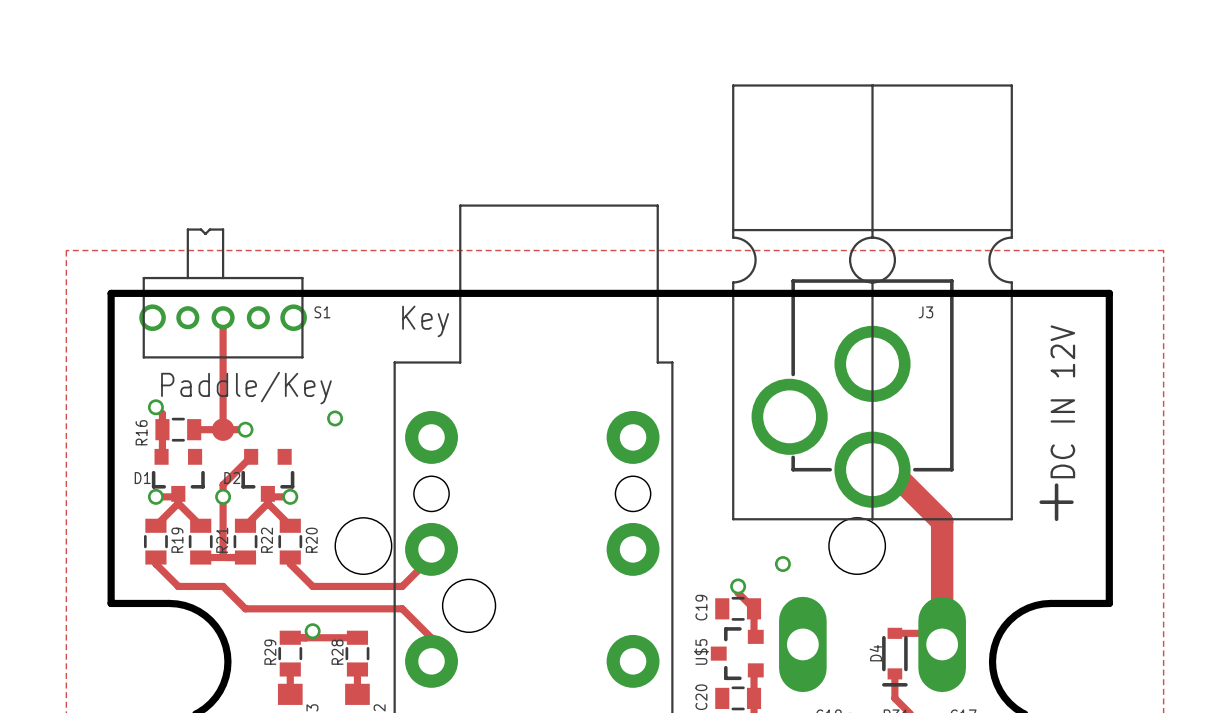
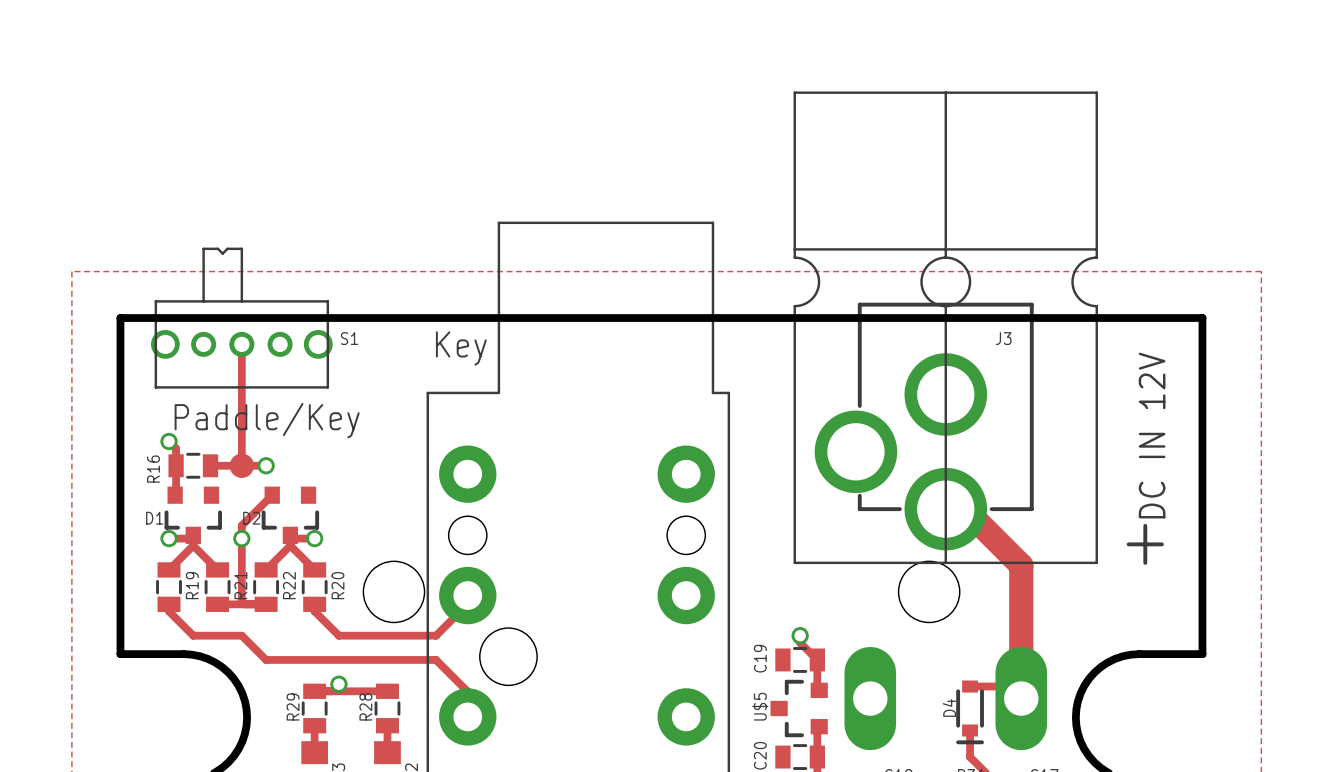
via: (335, 418) -> none
via: (782, 564) -> none

